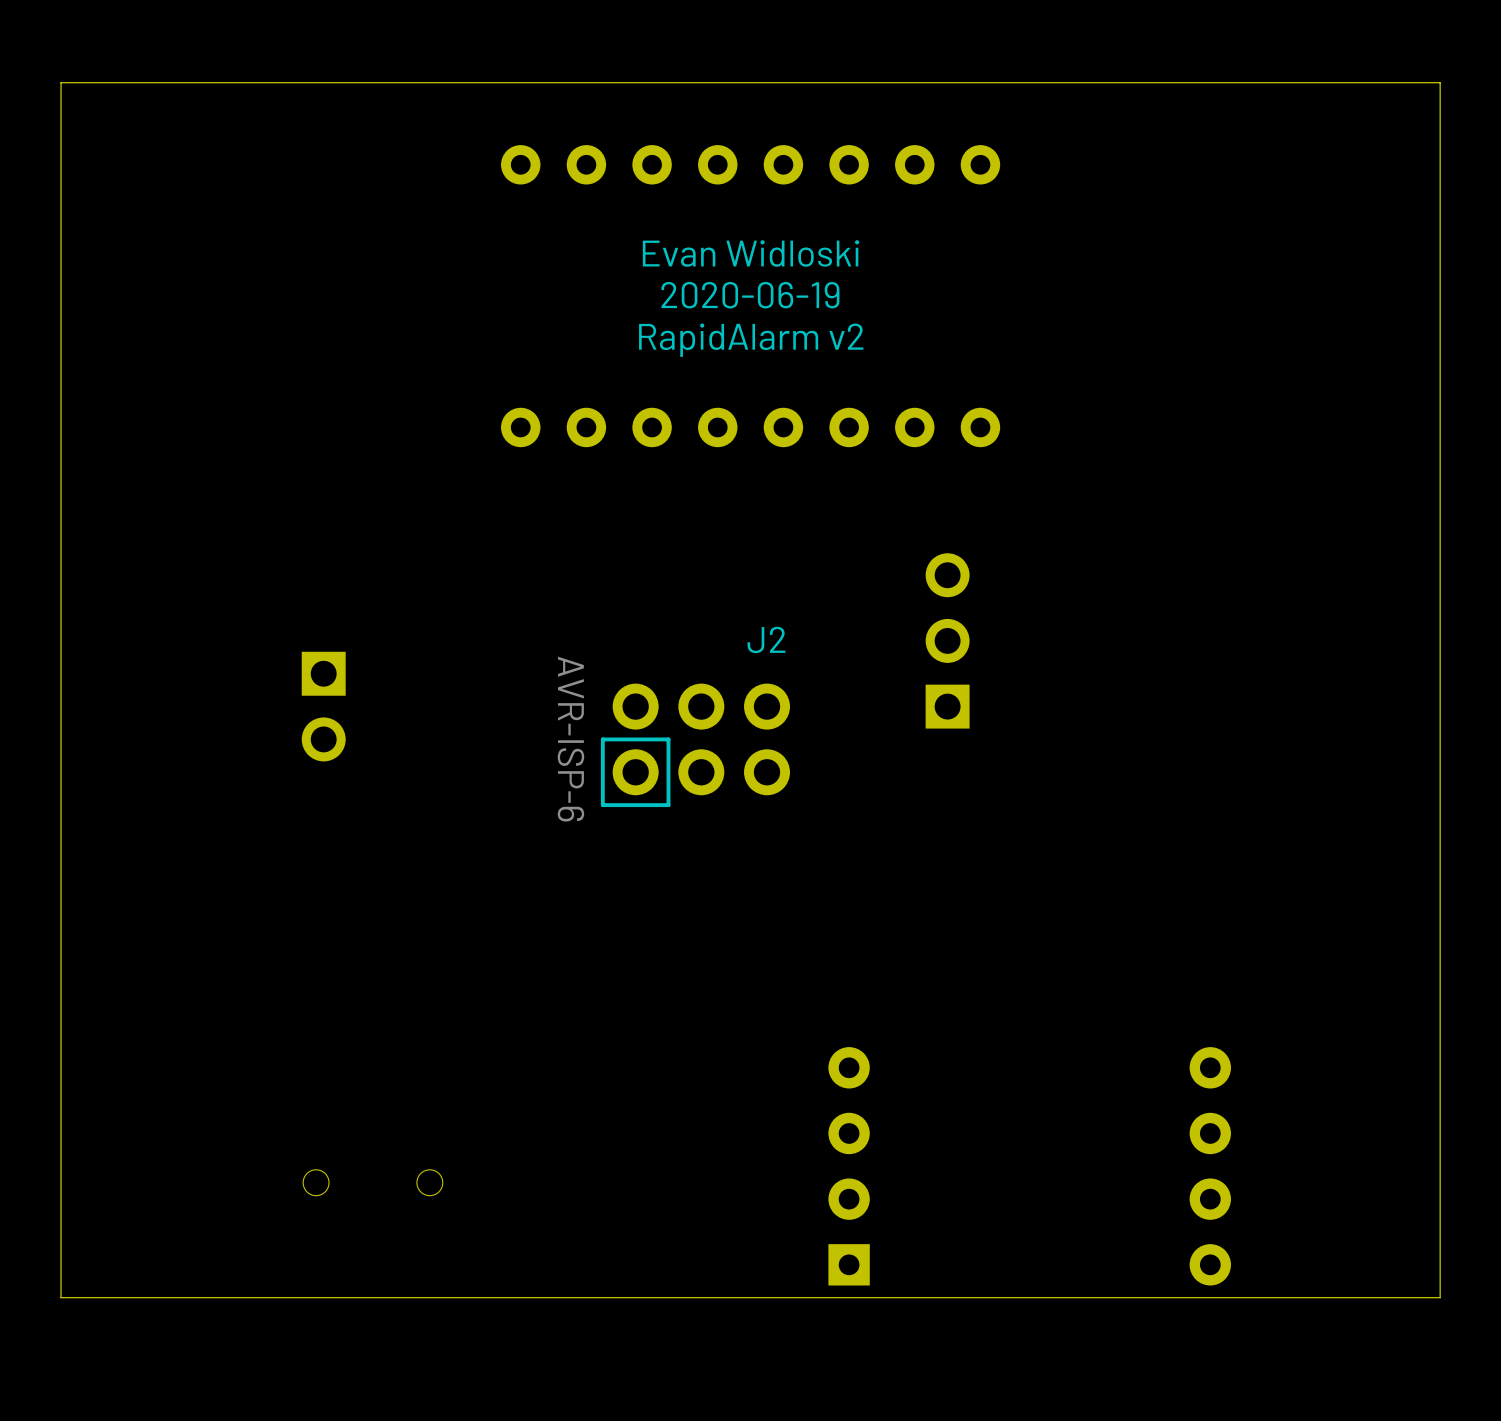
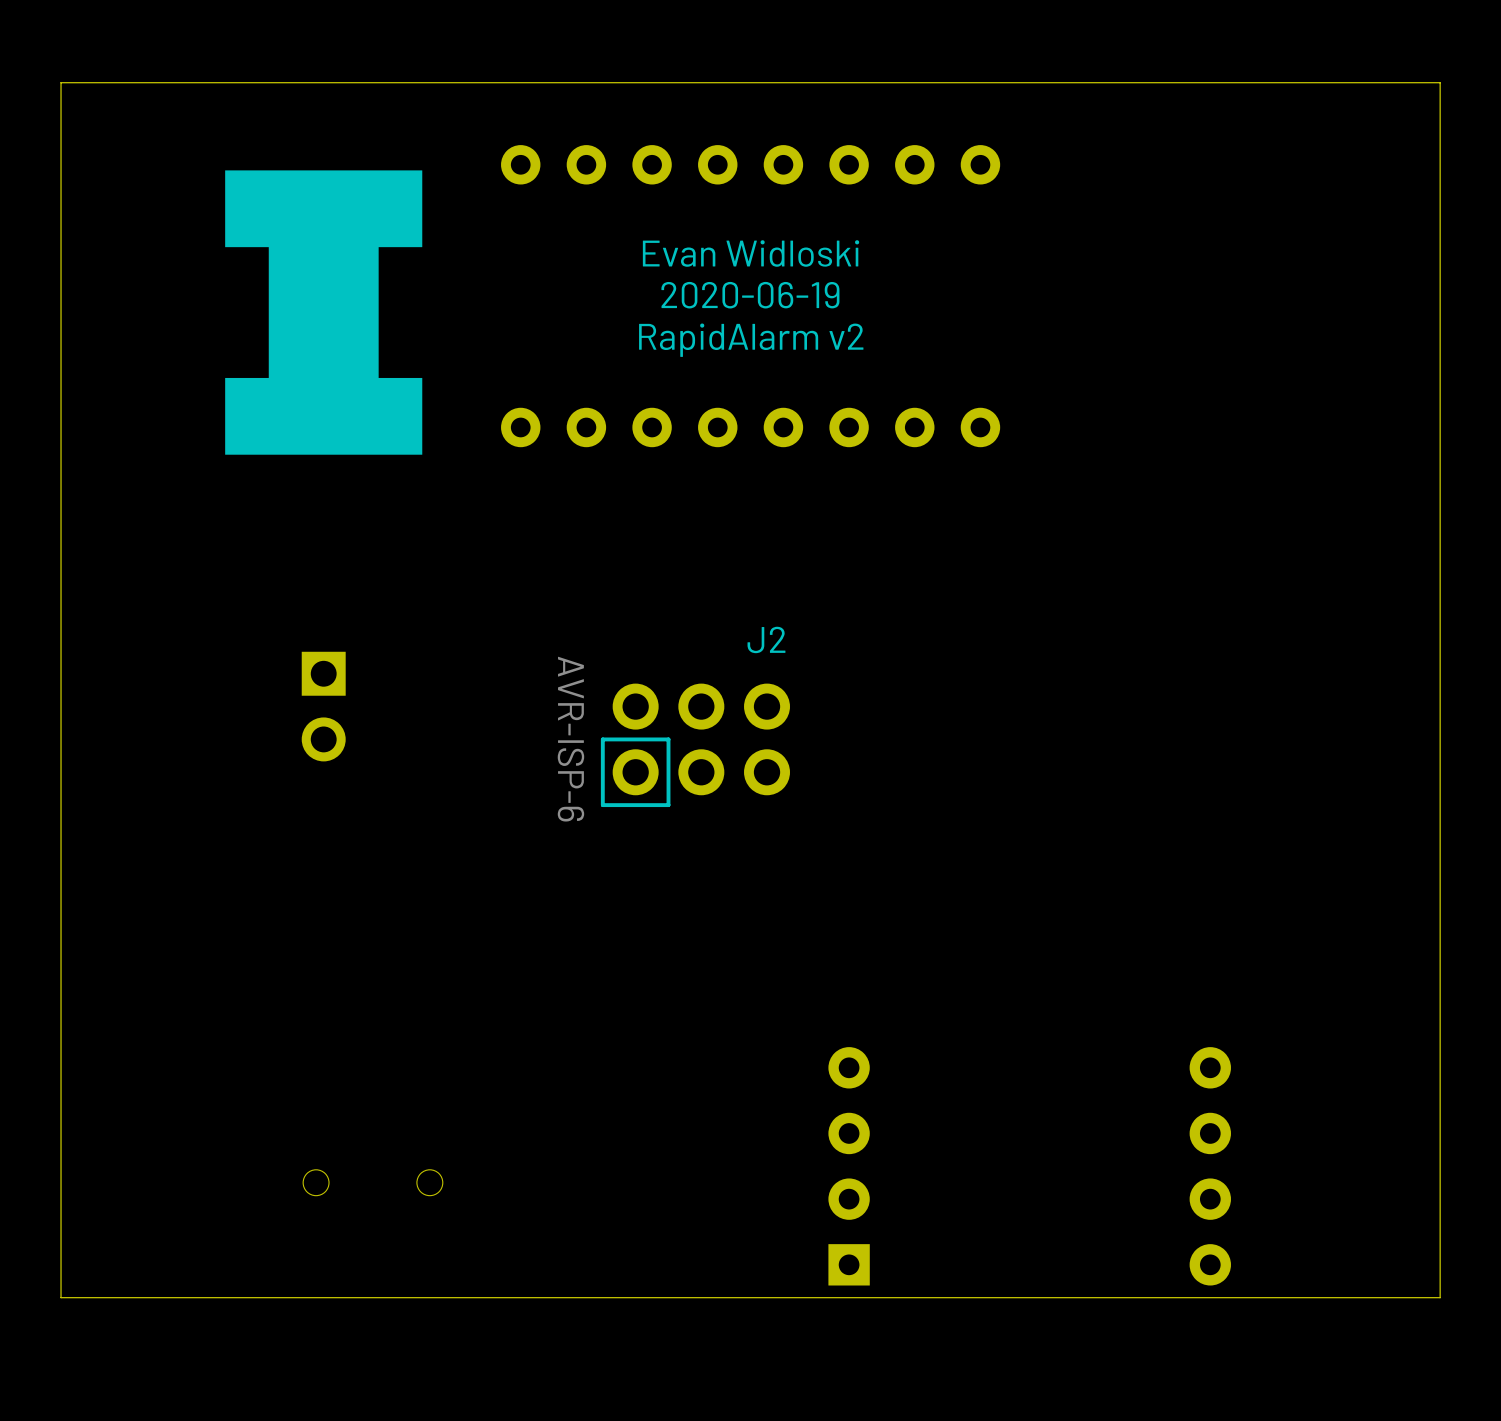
drawing: none -> [225, 170, 423, 455]
part: (947, 640) -> none

